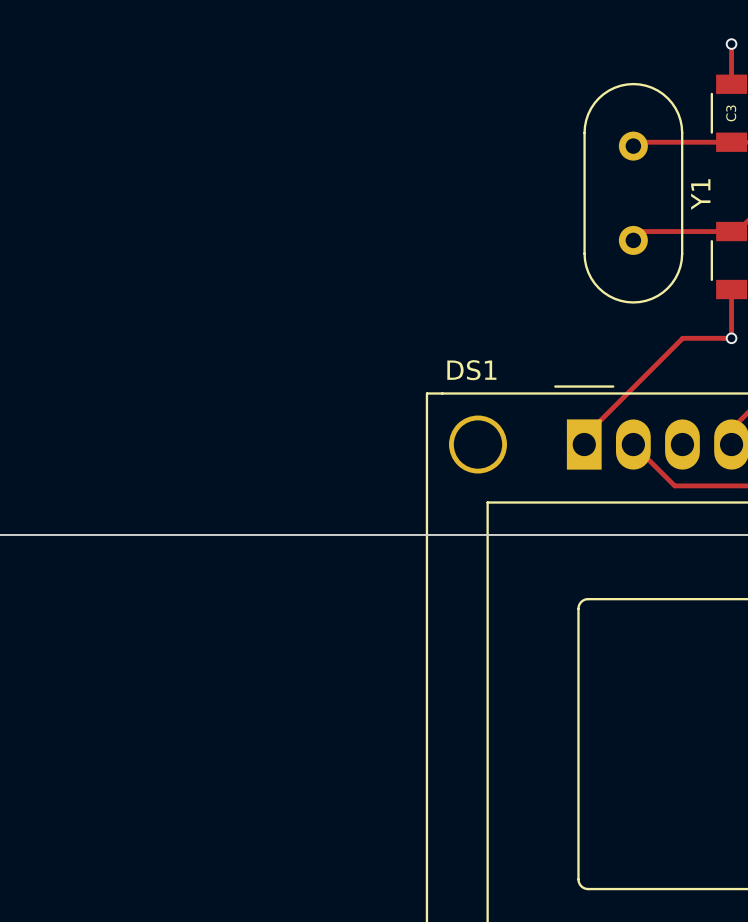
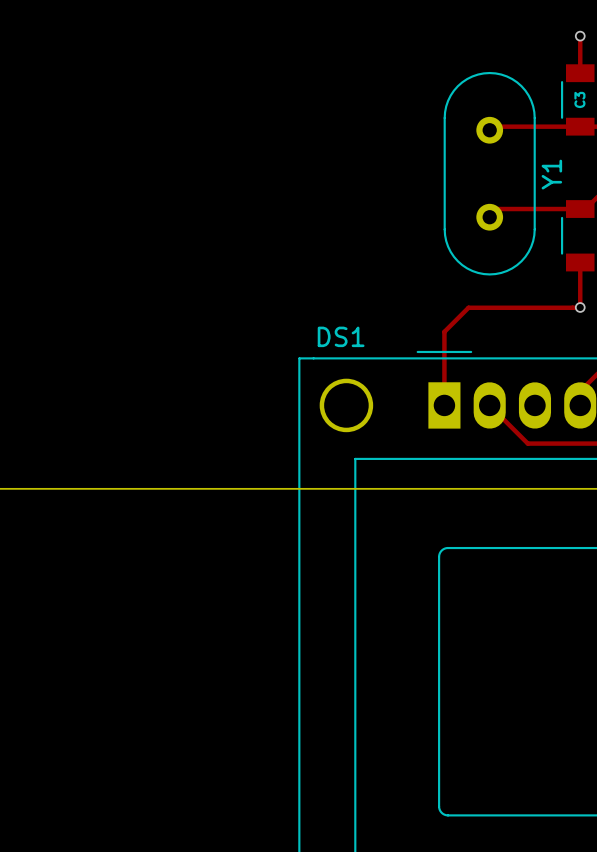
track: (731, 338) (682, 338) (584, 436) -> (580, 307) (468, 307) (444, 331) (444, 398)

